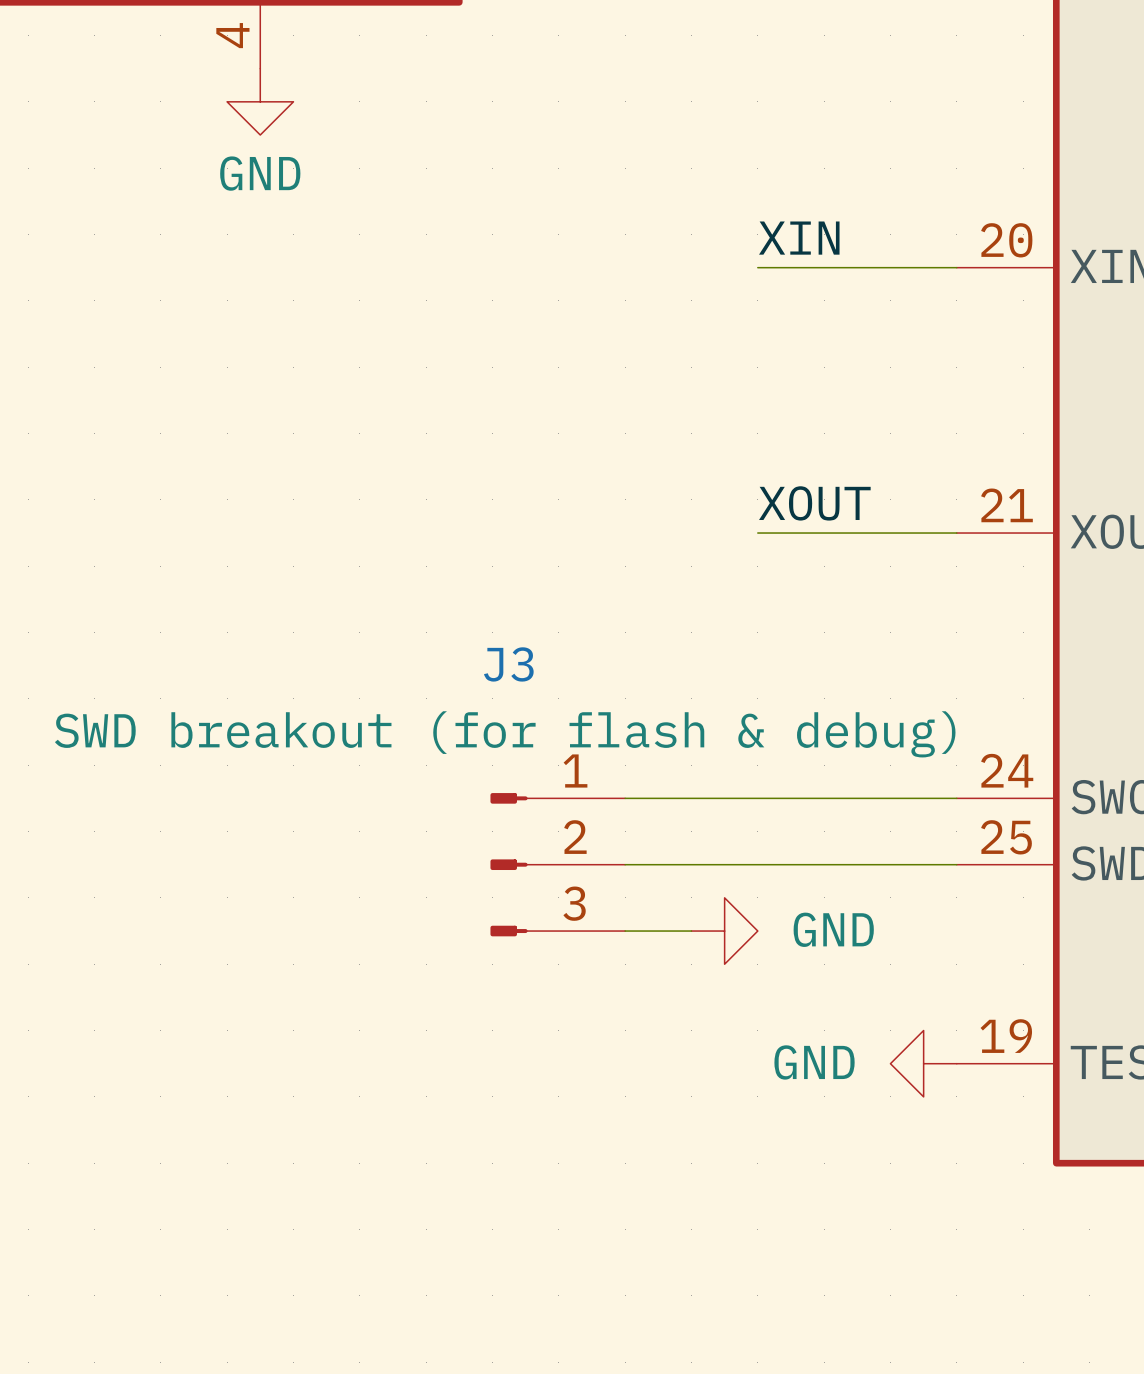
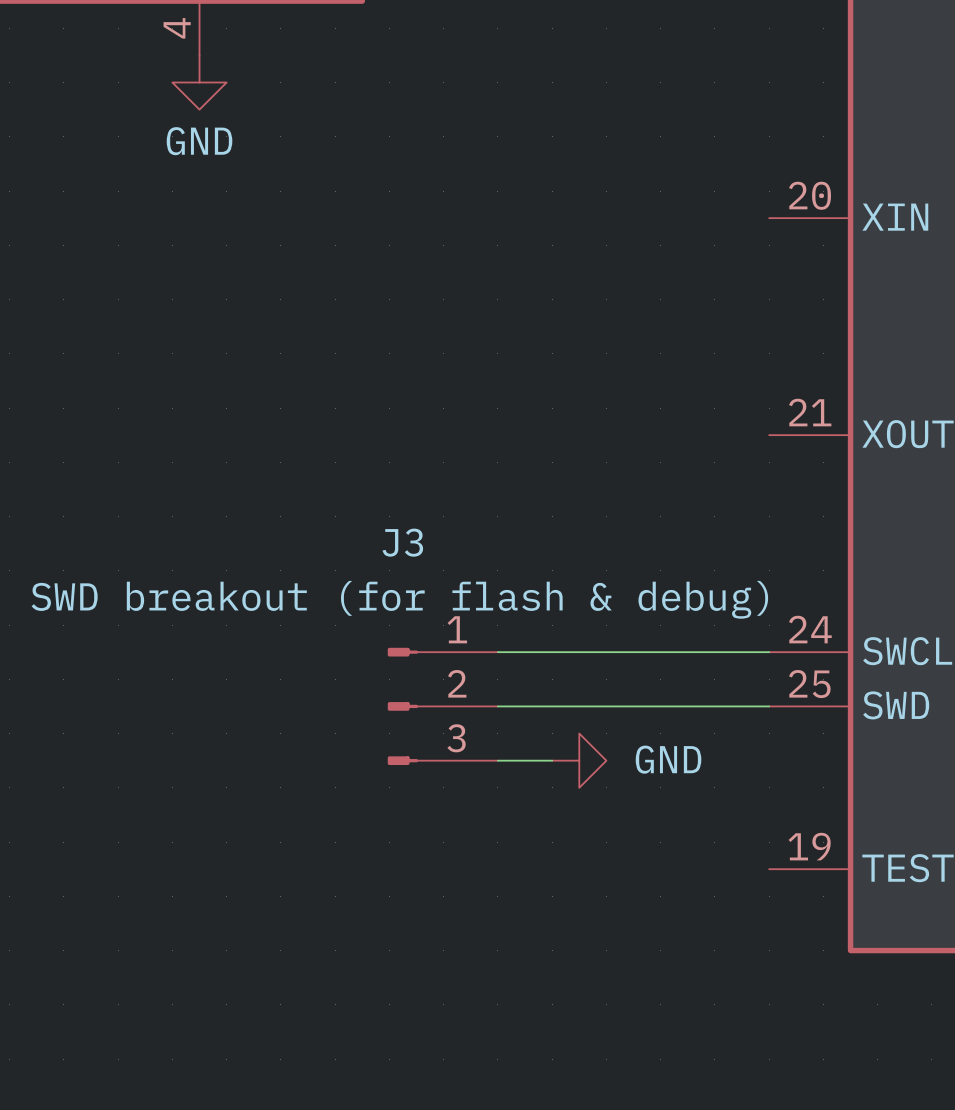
label: XIN (799, 238) -> none
wire: (757, 267) (956, 267) -> none
label: XOUT (814, 503) -> none
wire: (757, 533) (956, 533) -> none
power symbol: GND (923, 1063) -> none

